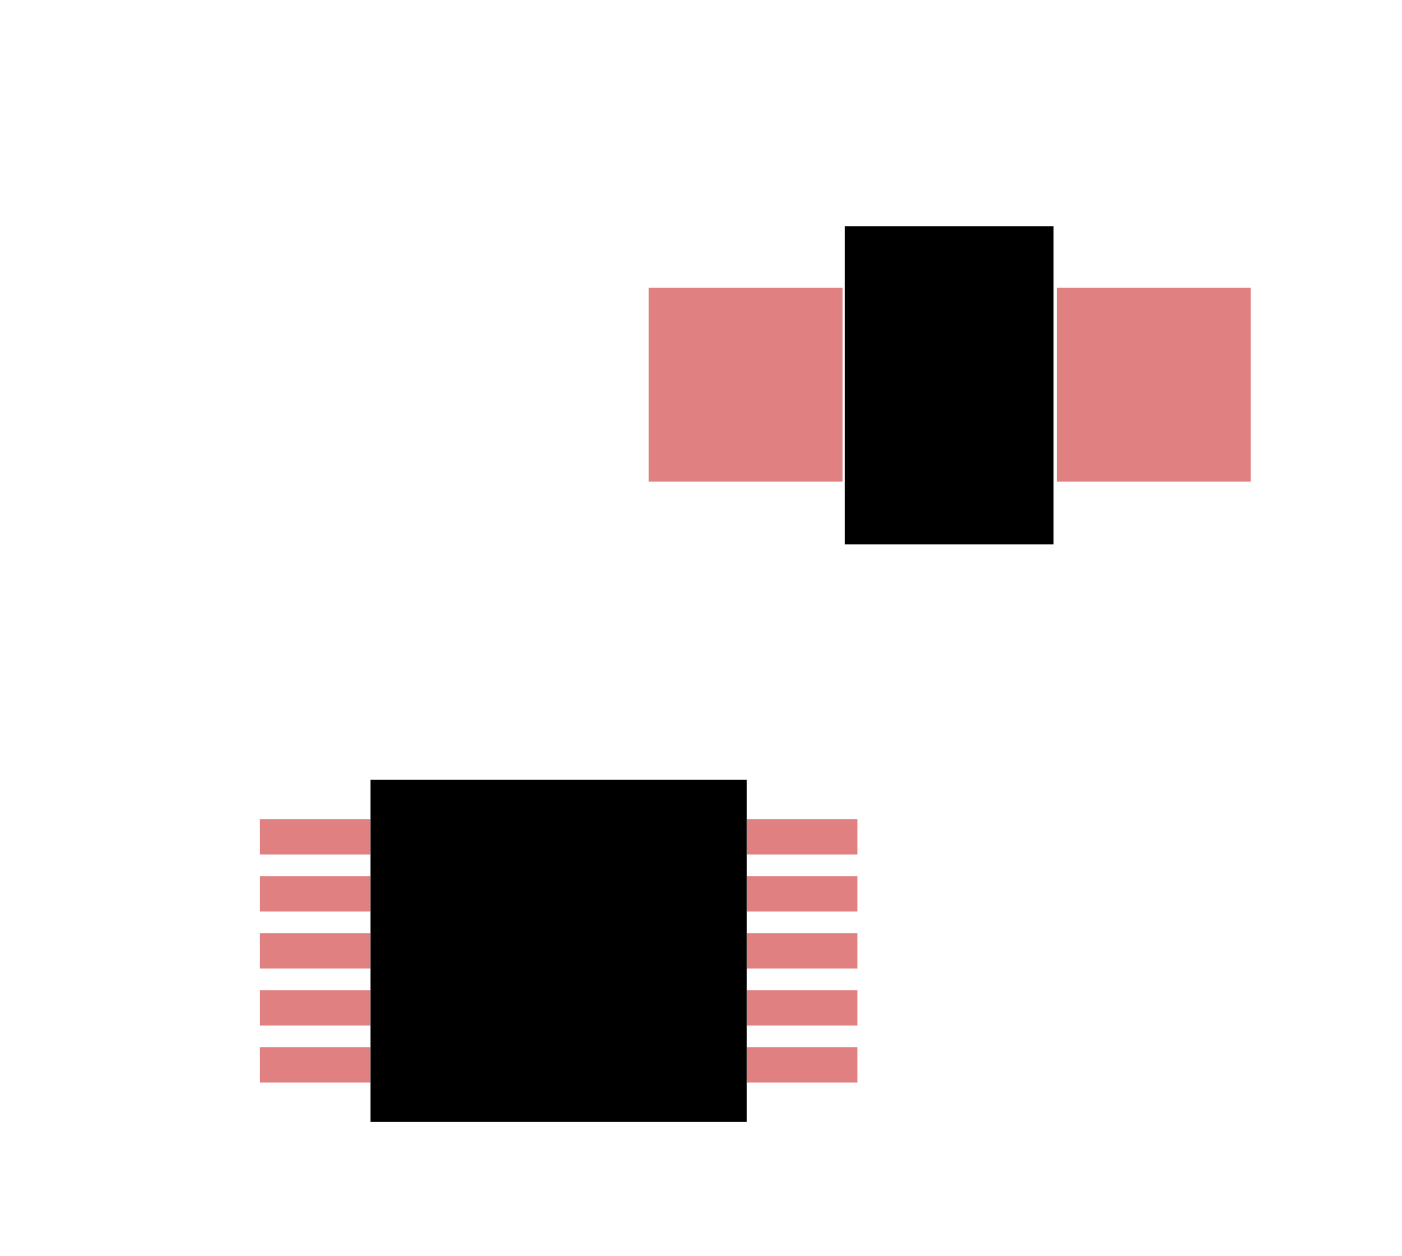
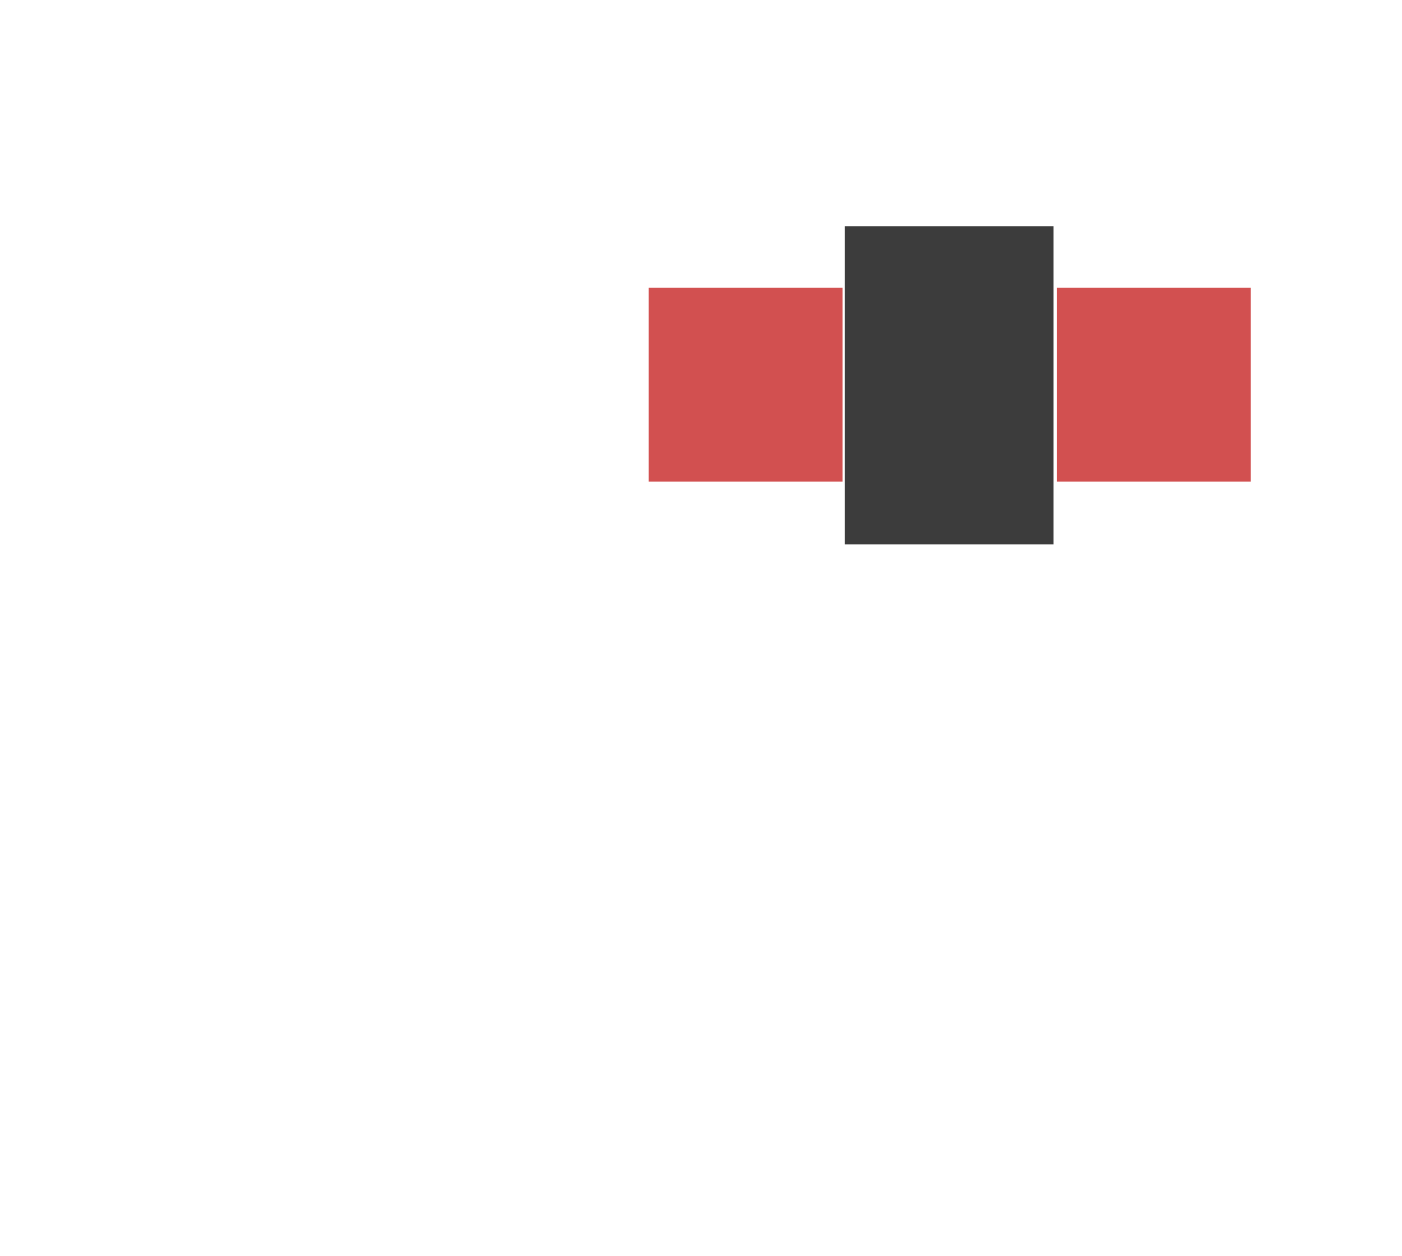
part: (558, 950) -> none

